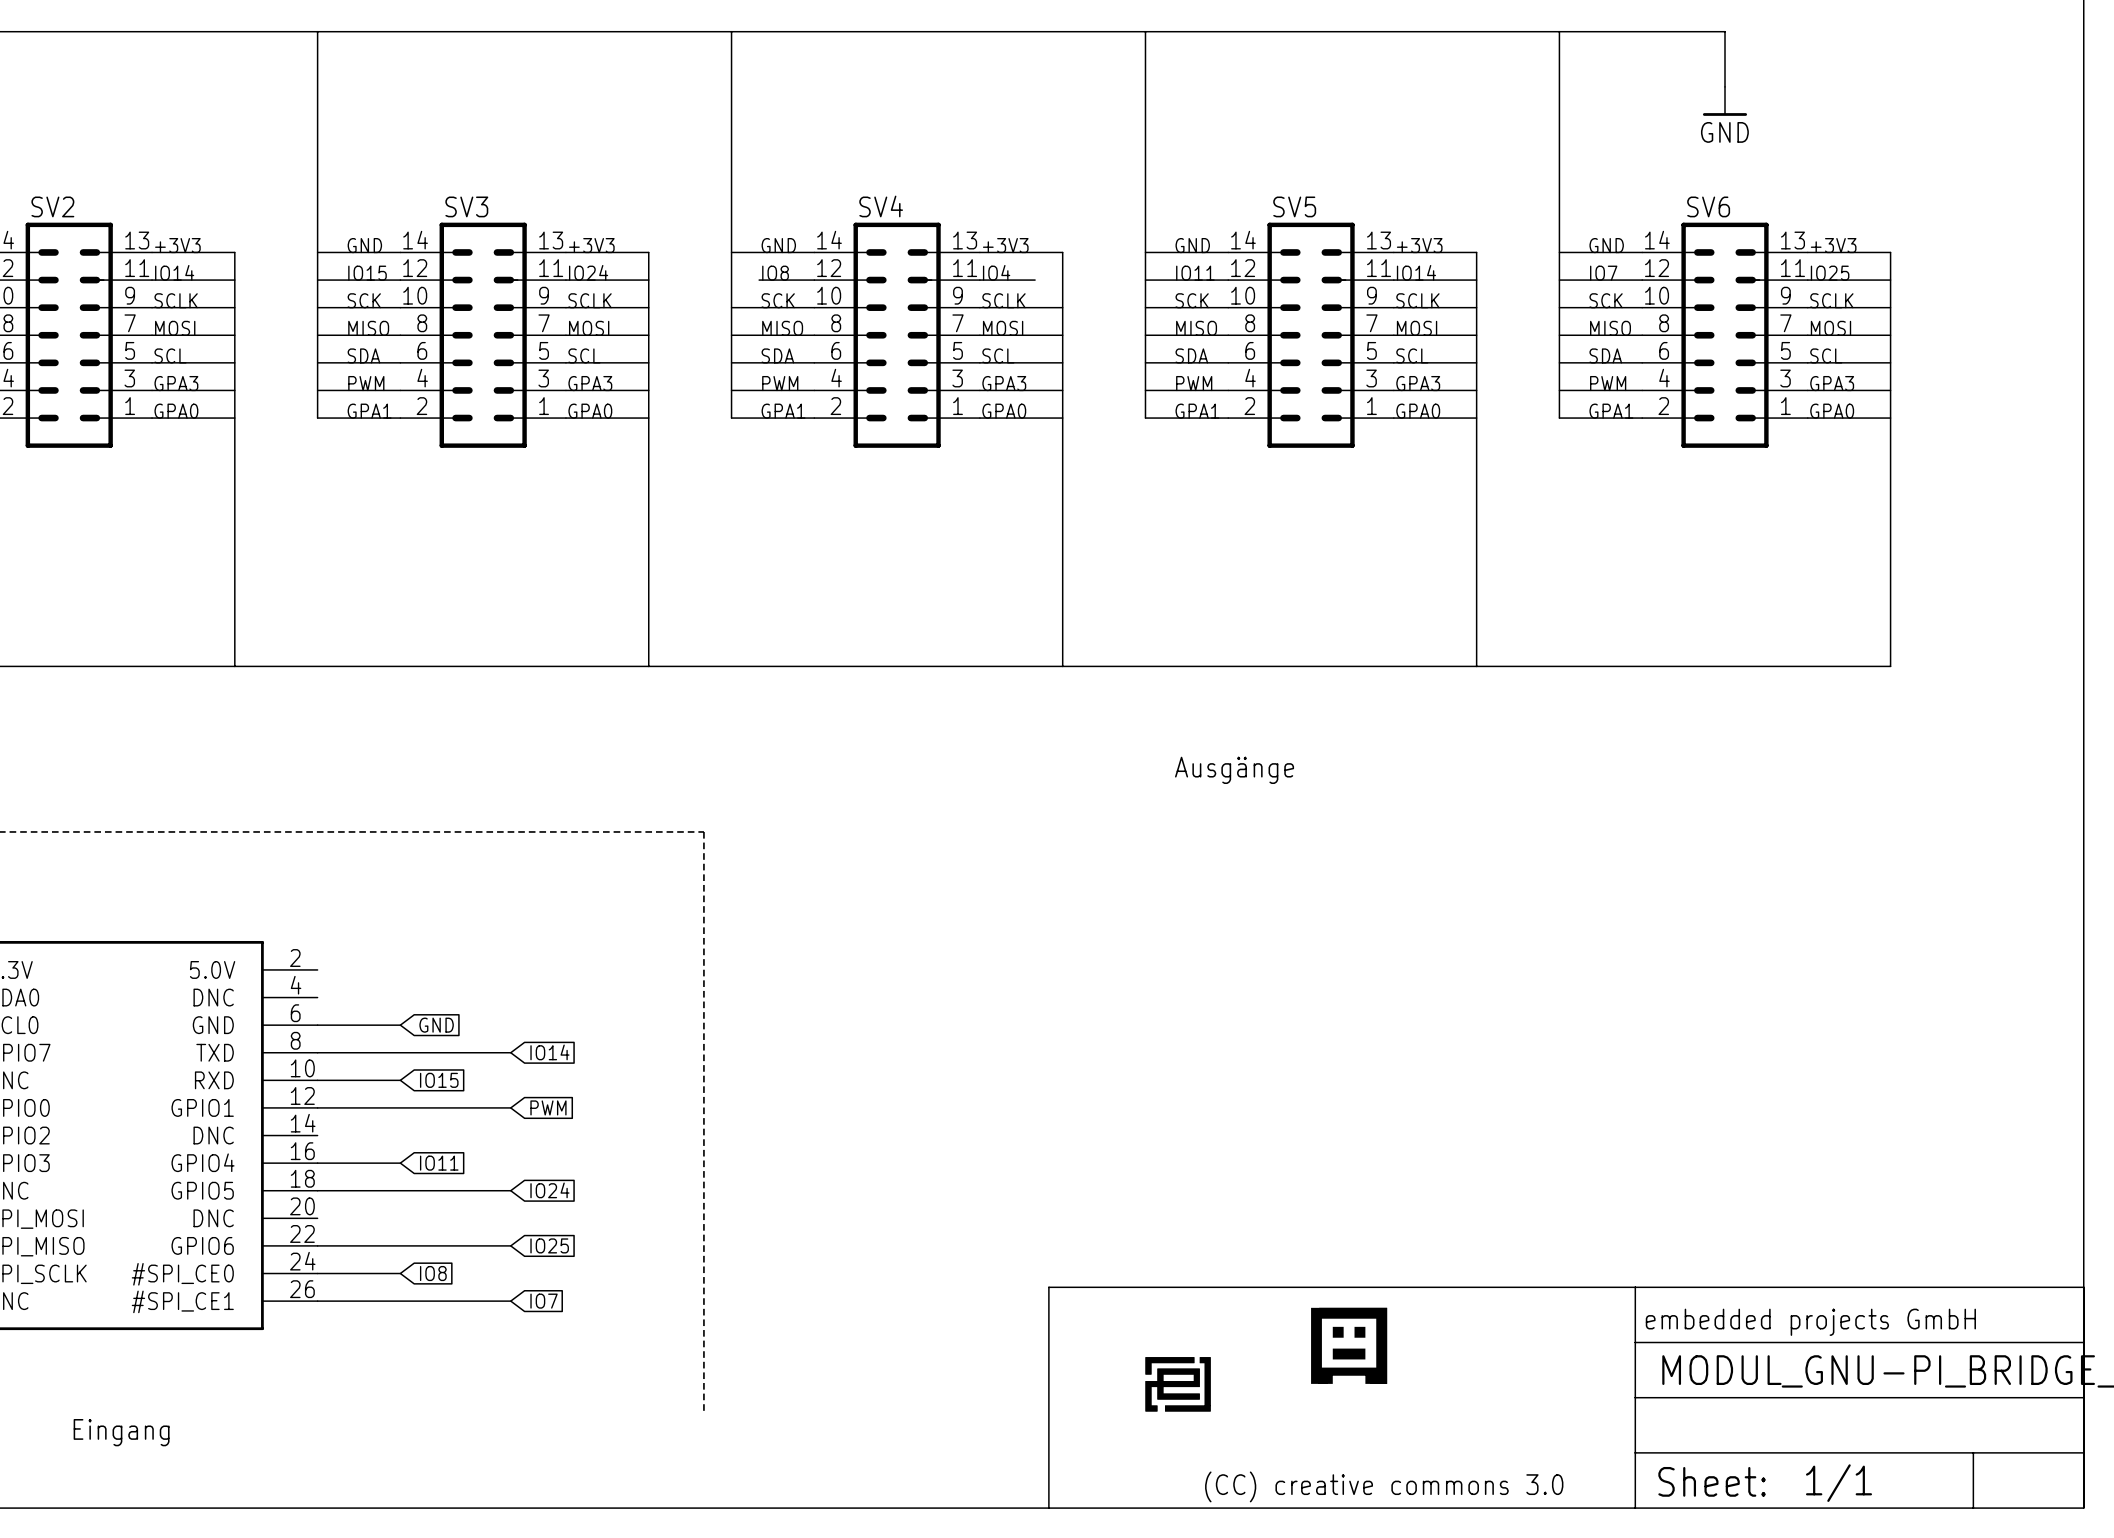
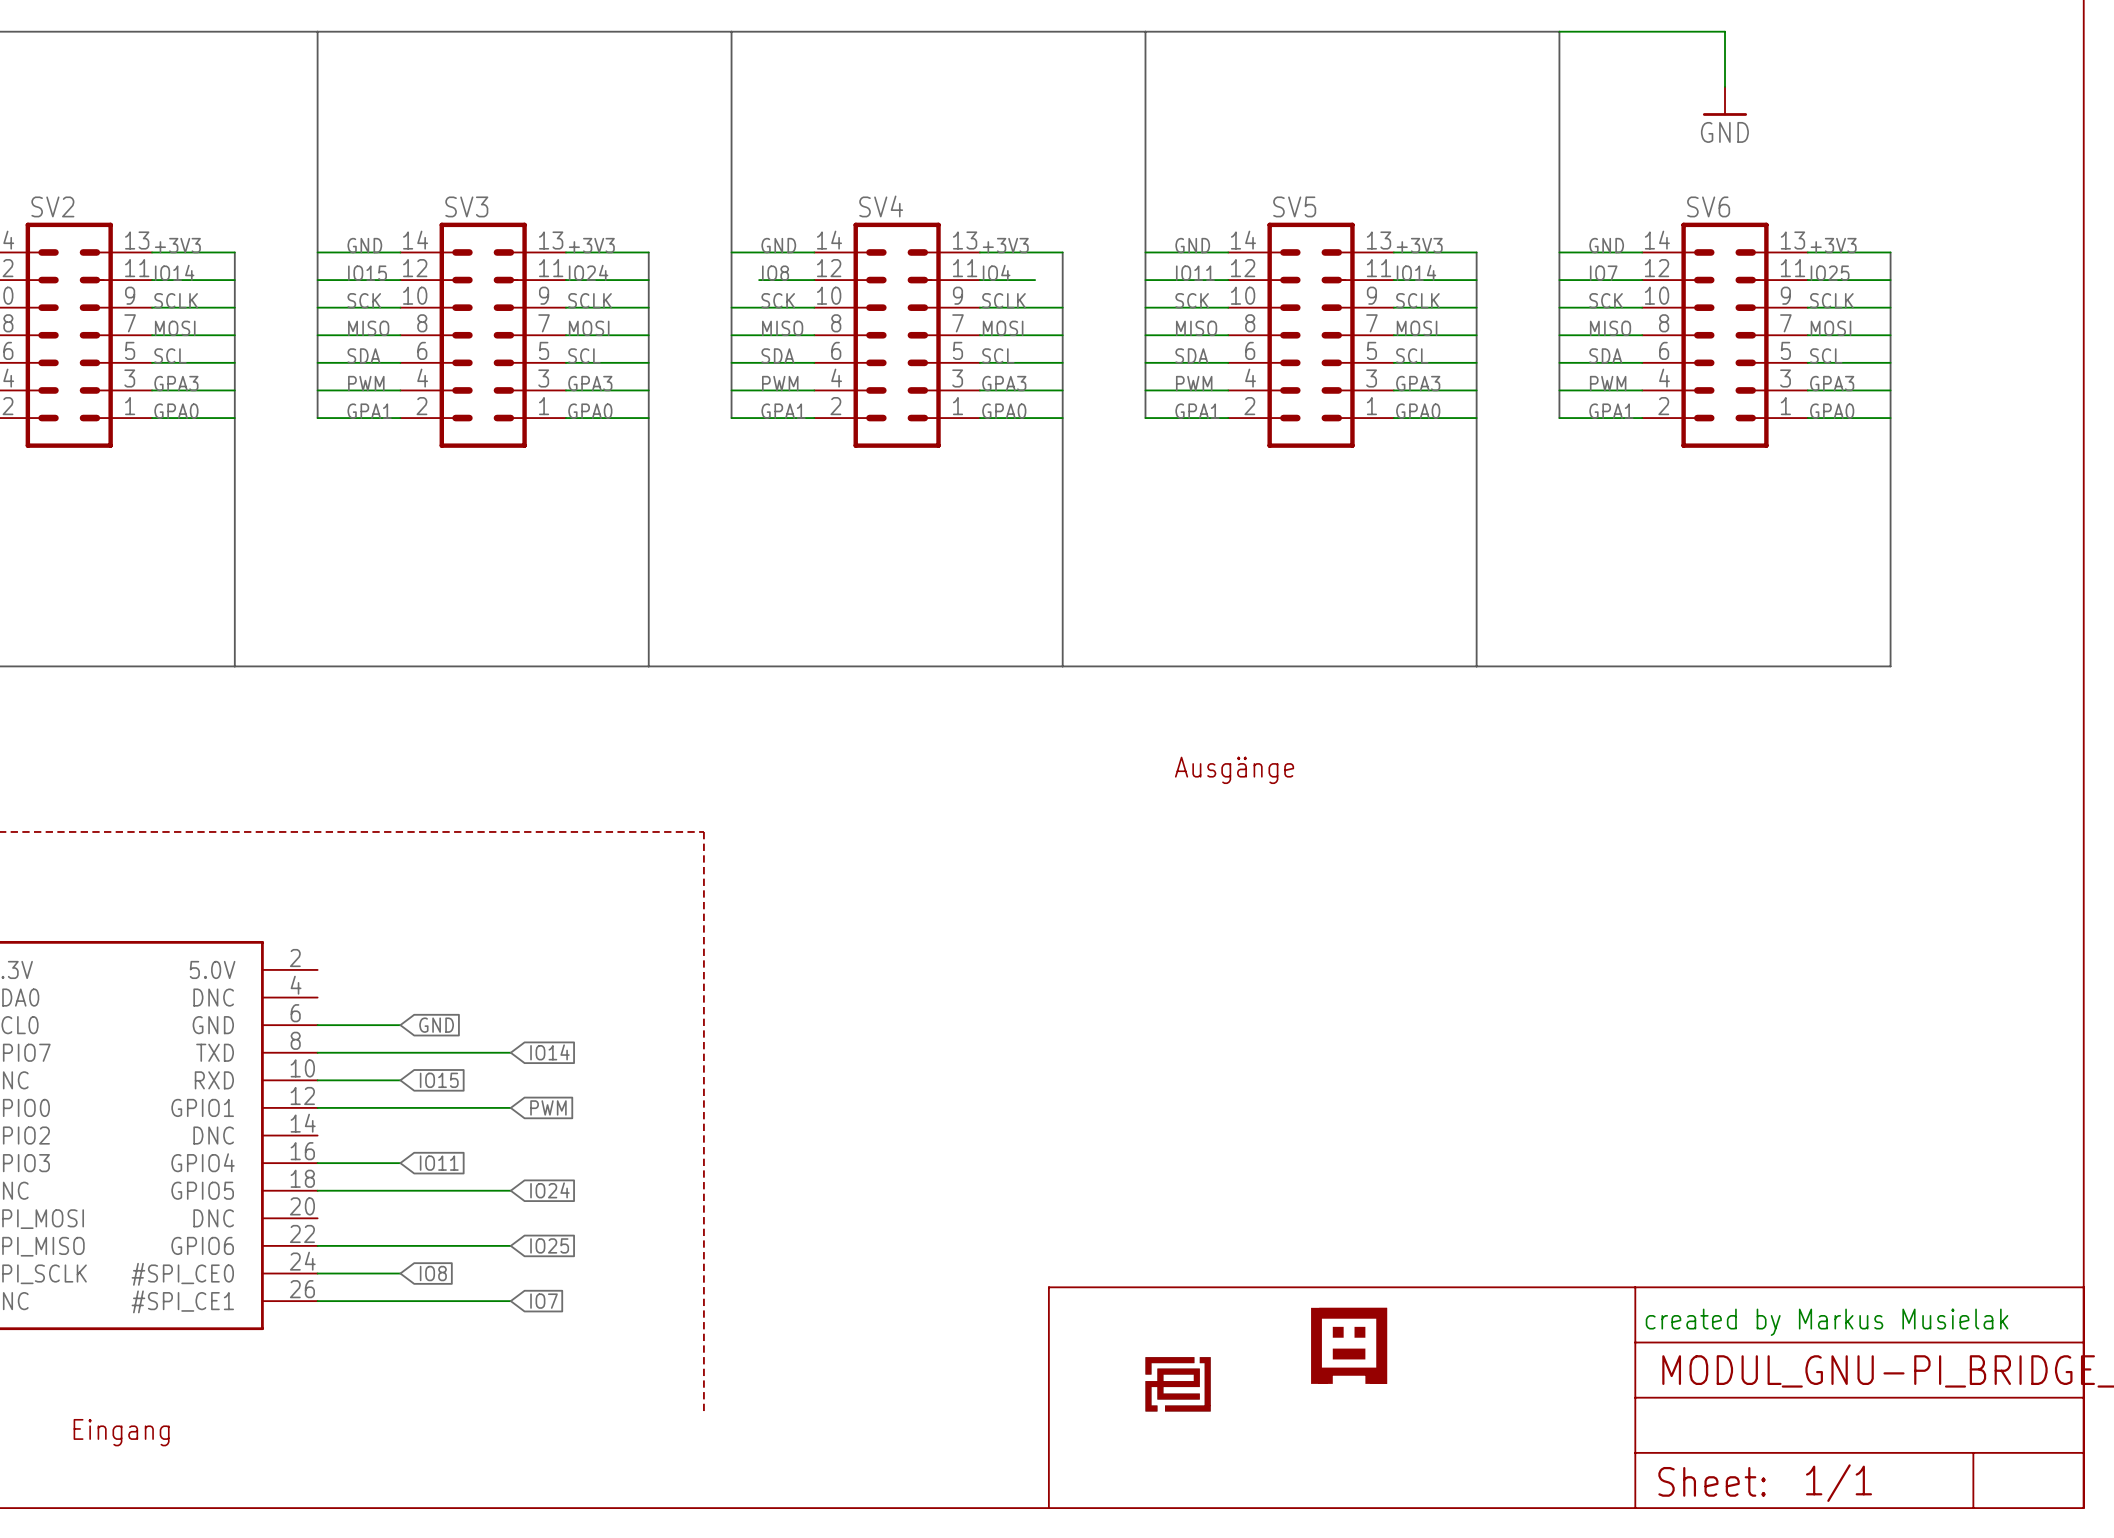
text: embedded projects GmbH (1810, 1322) -> created by Markus Musielak (1827, 1322)
text: (CC) creative commons 3.0 (1384, 1486) -> none

